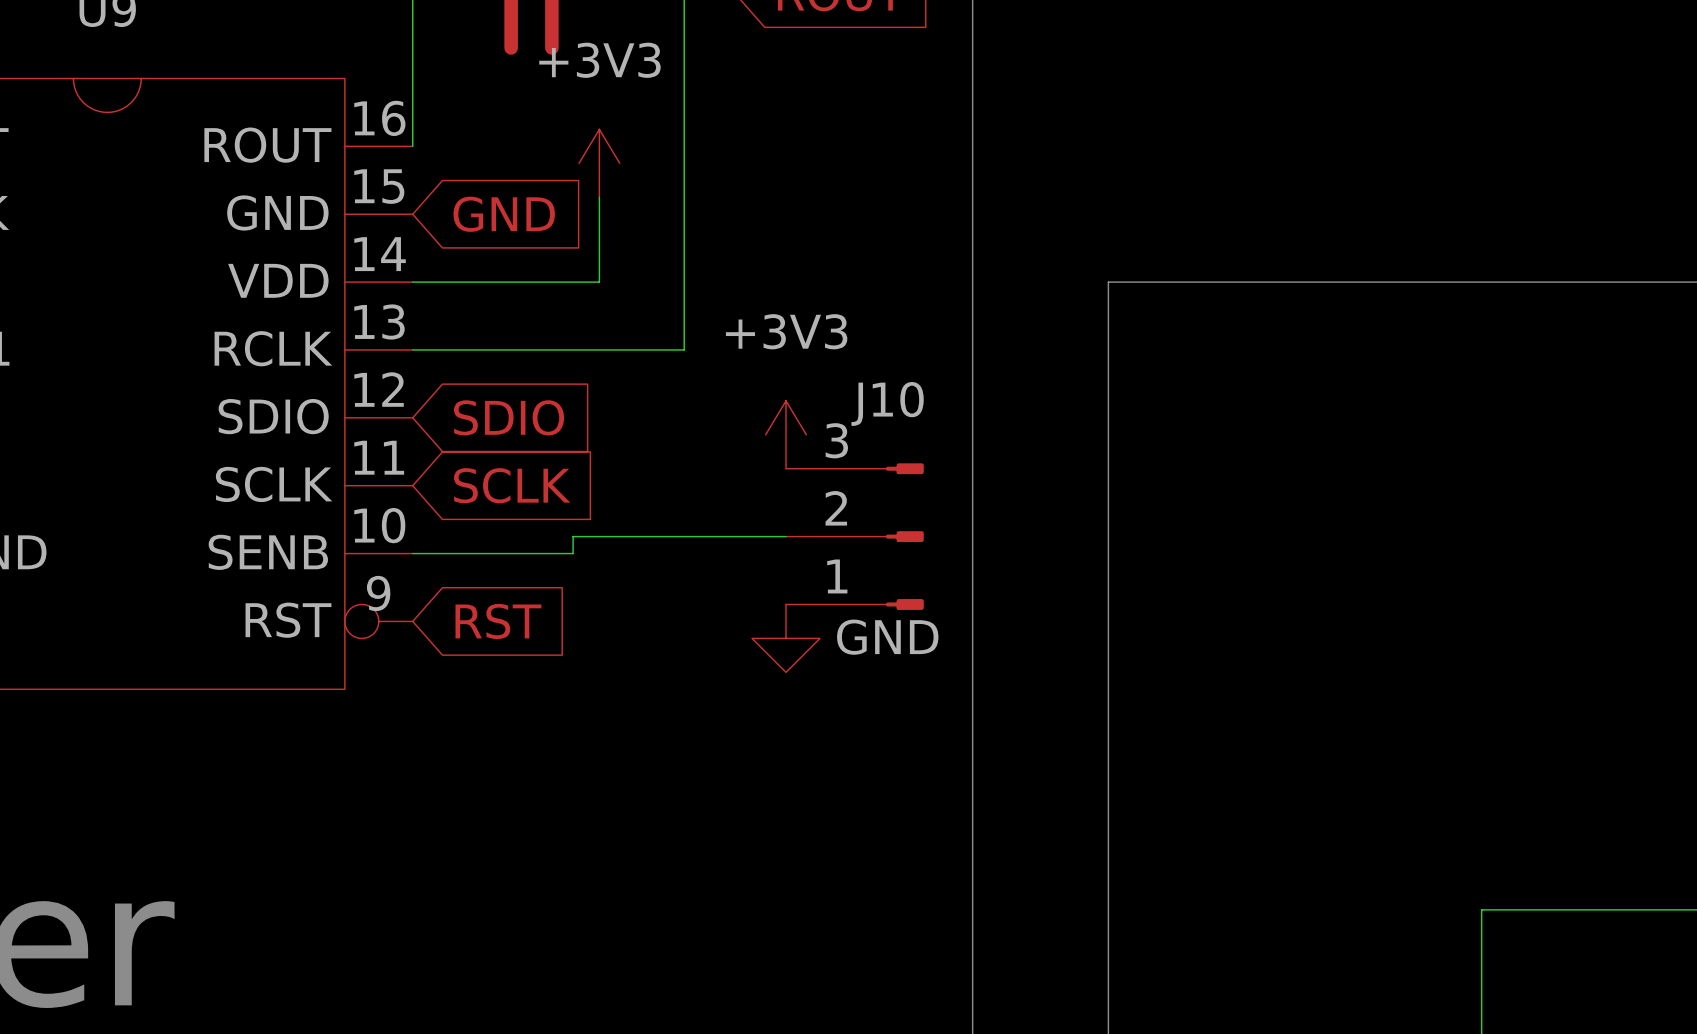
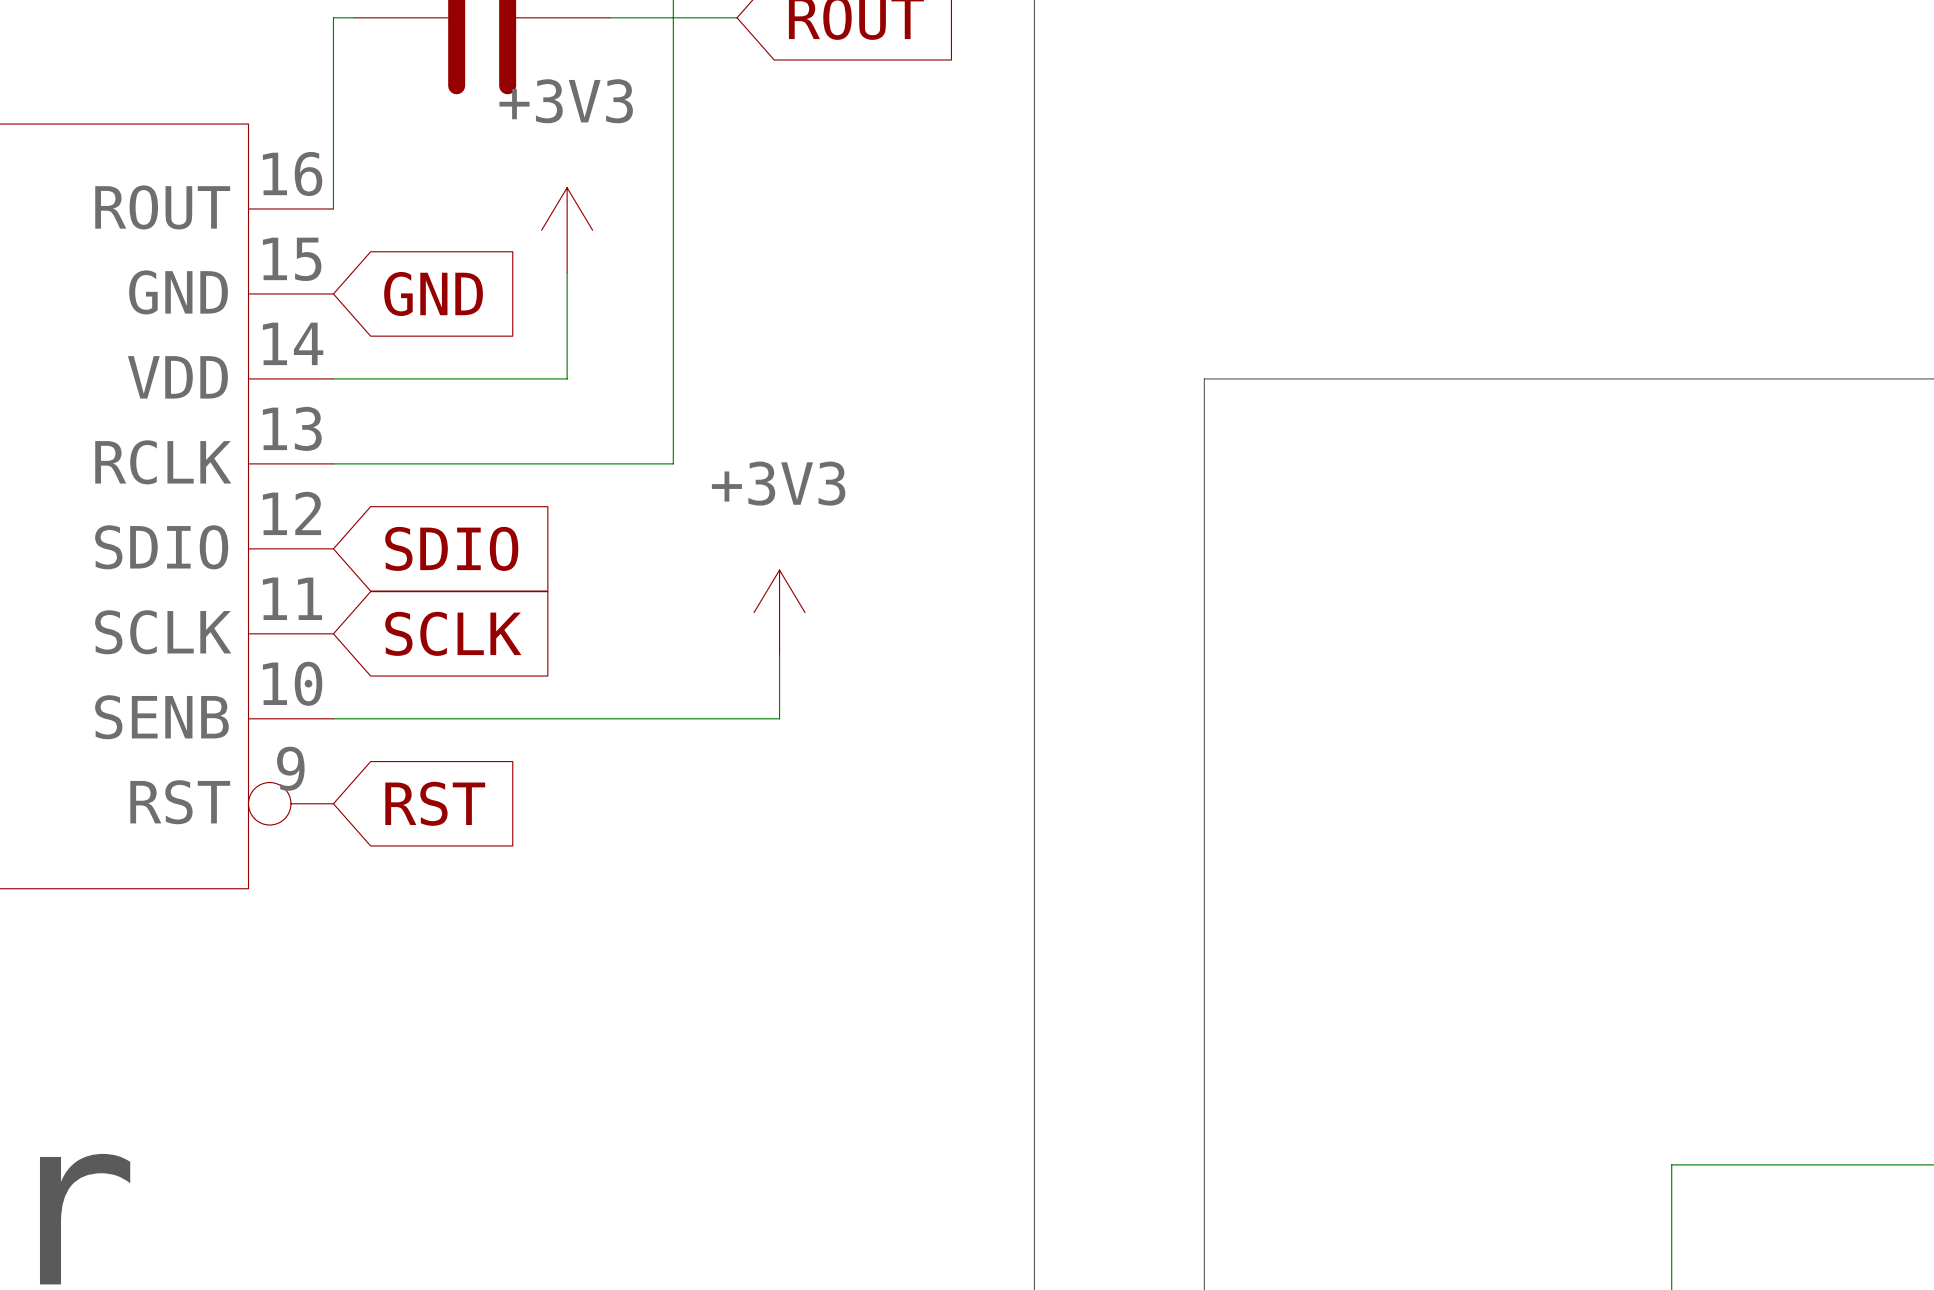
power symbol position: +3V3 (786, 434) -> +3V3 (779, 612)
wire: (786, 536) (573, 536) (573, 553) -> (779, 655) (779, 718) (534, 718)
J10: (854, 536) -> none
power symbol: GND (786, 638) -> none

